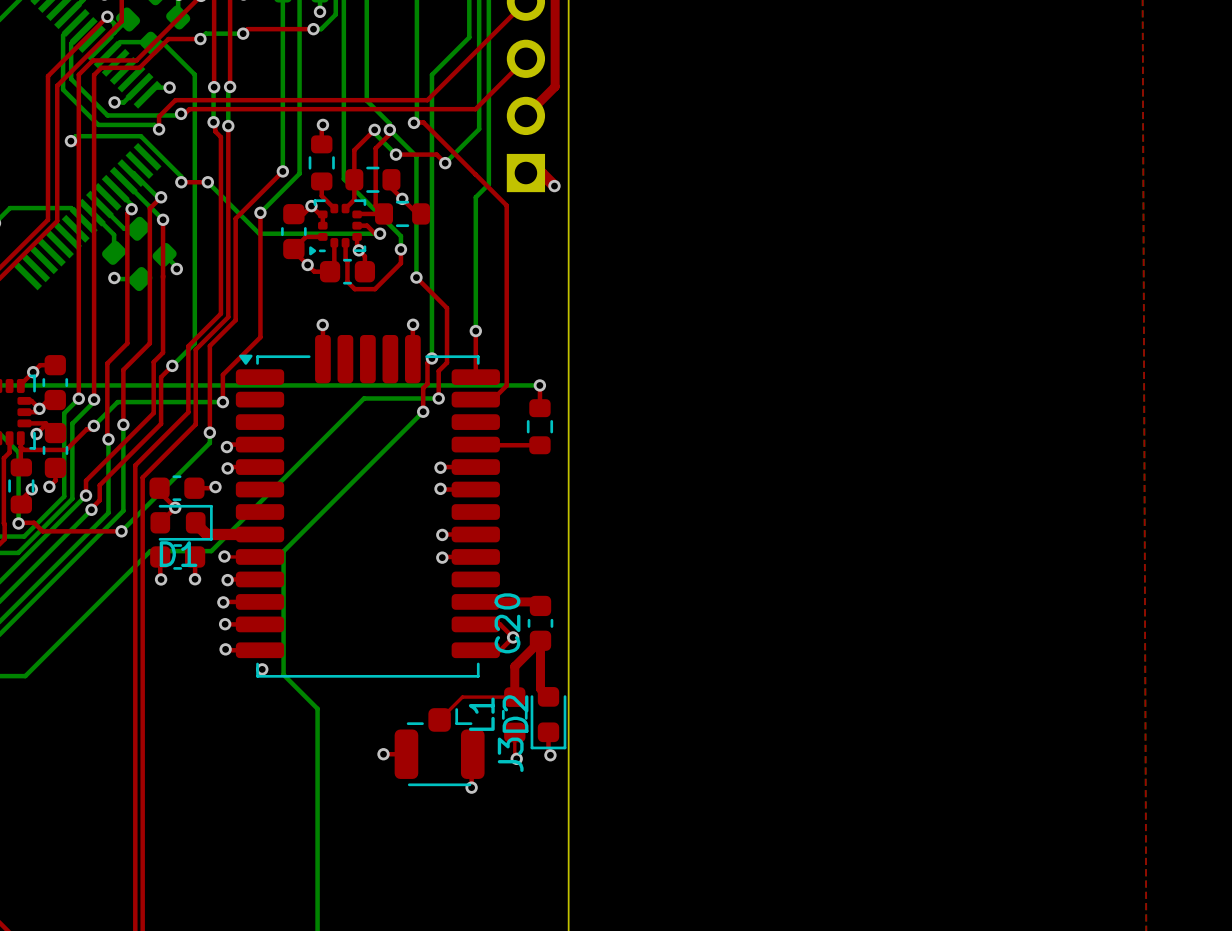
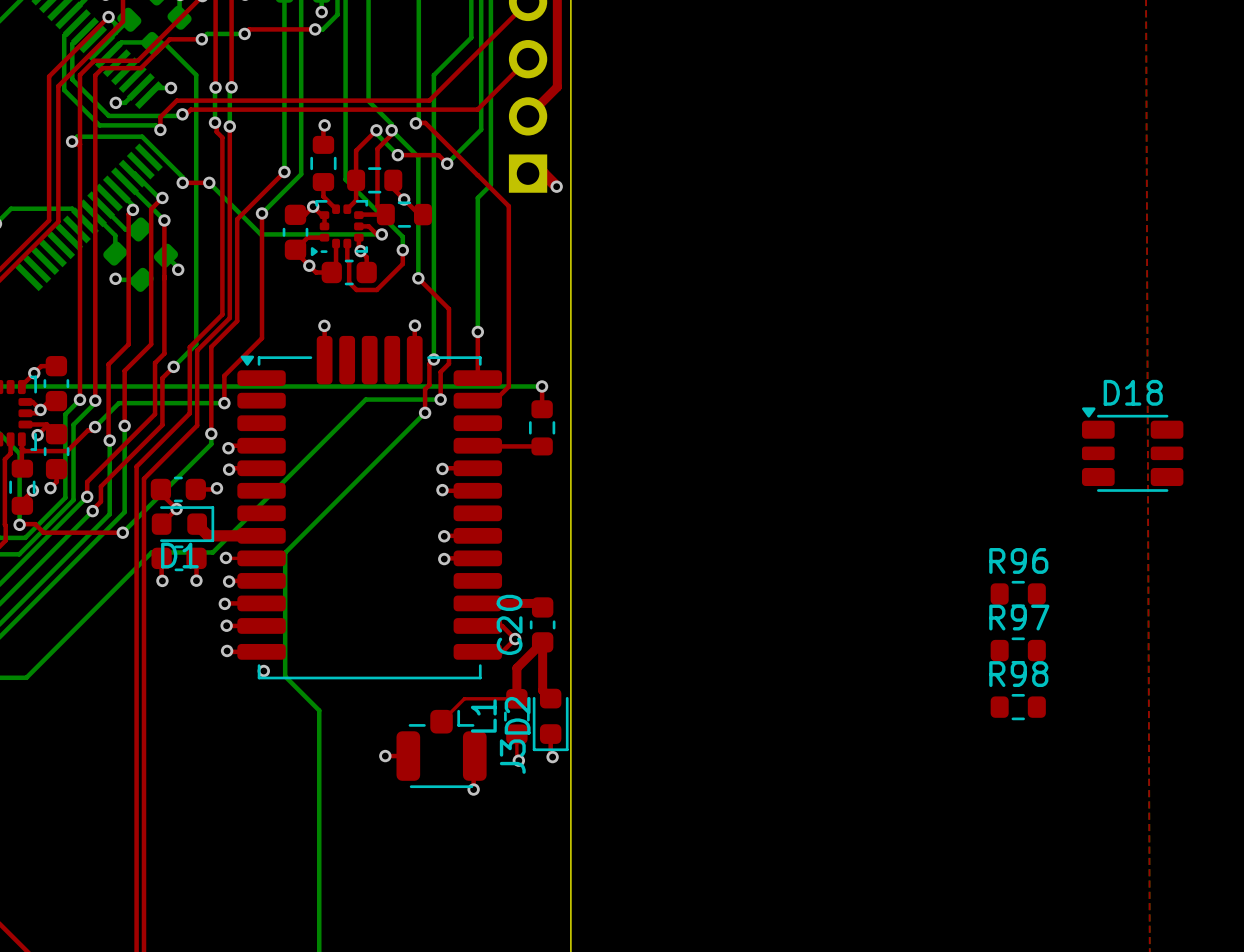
D18: none -> (1132, 449)
R96: none -> (1018, 594)
R97: none -> (1018, 650)
R98: none -> (1018, 707)

